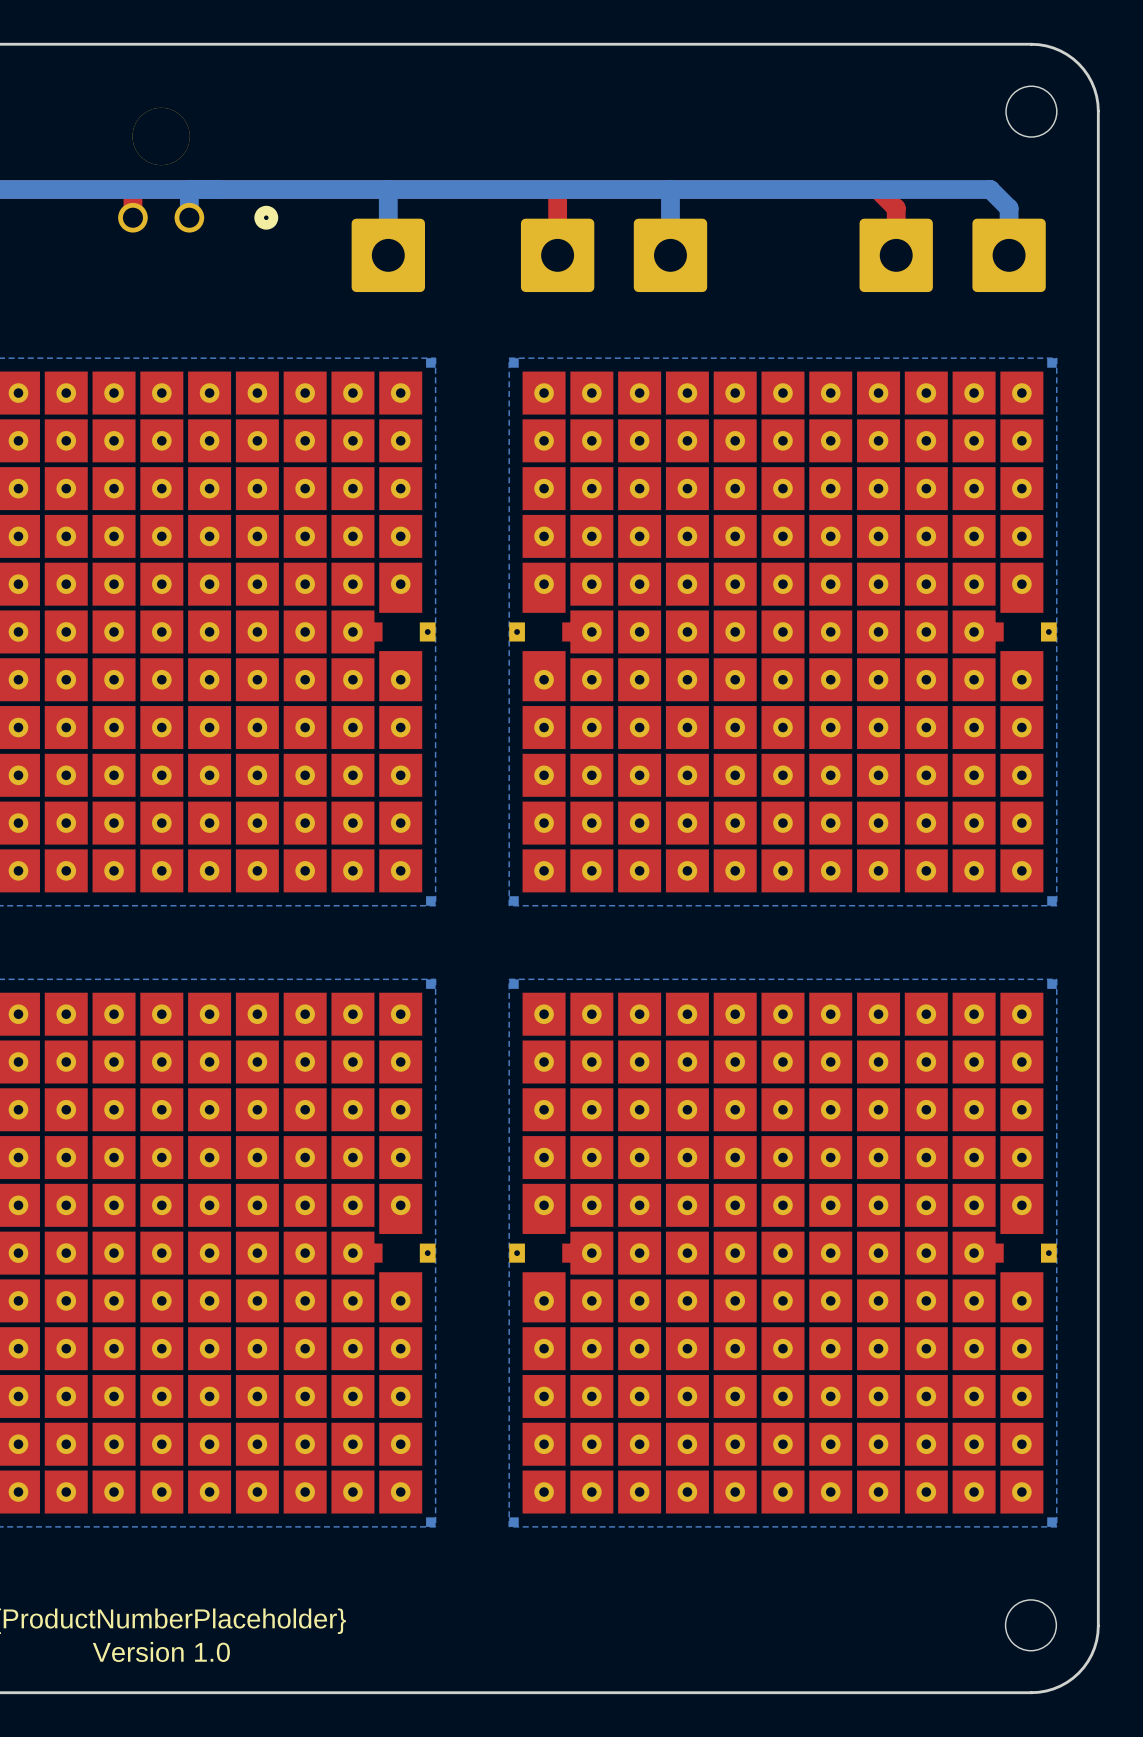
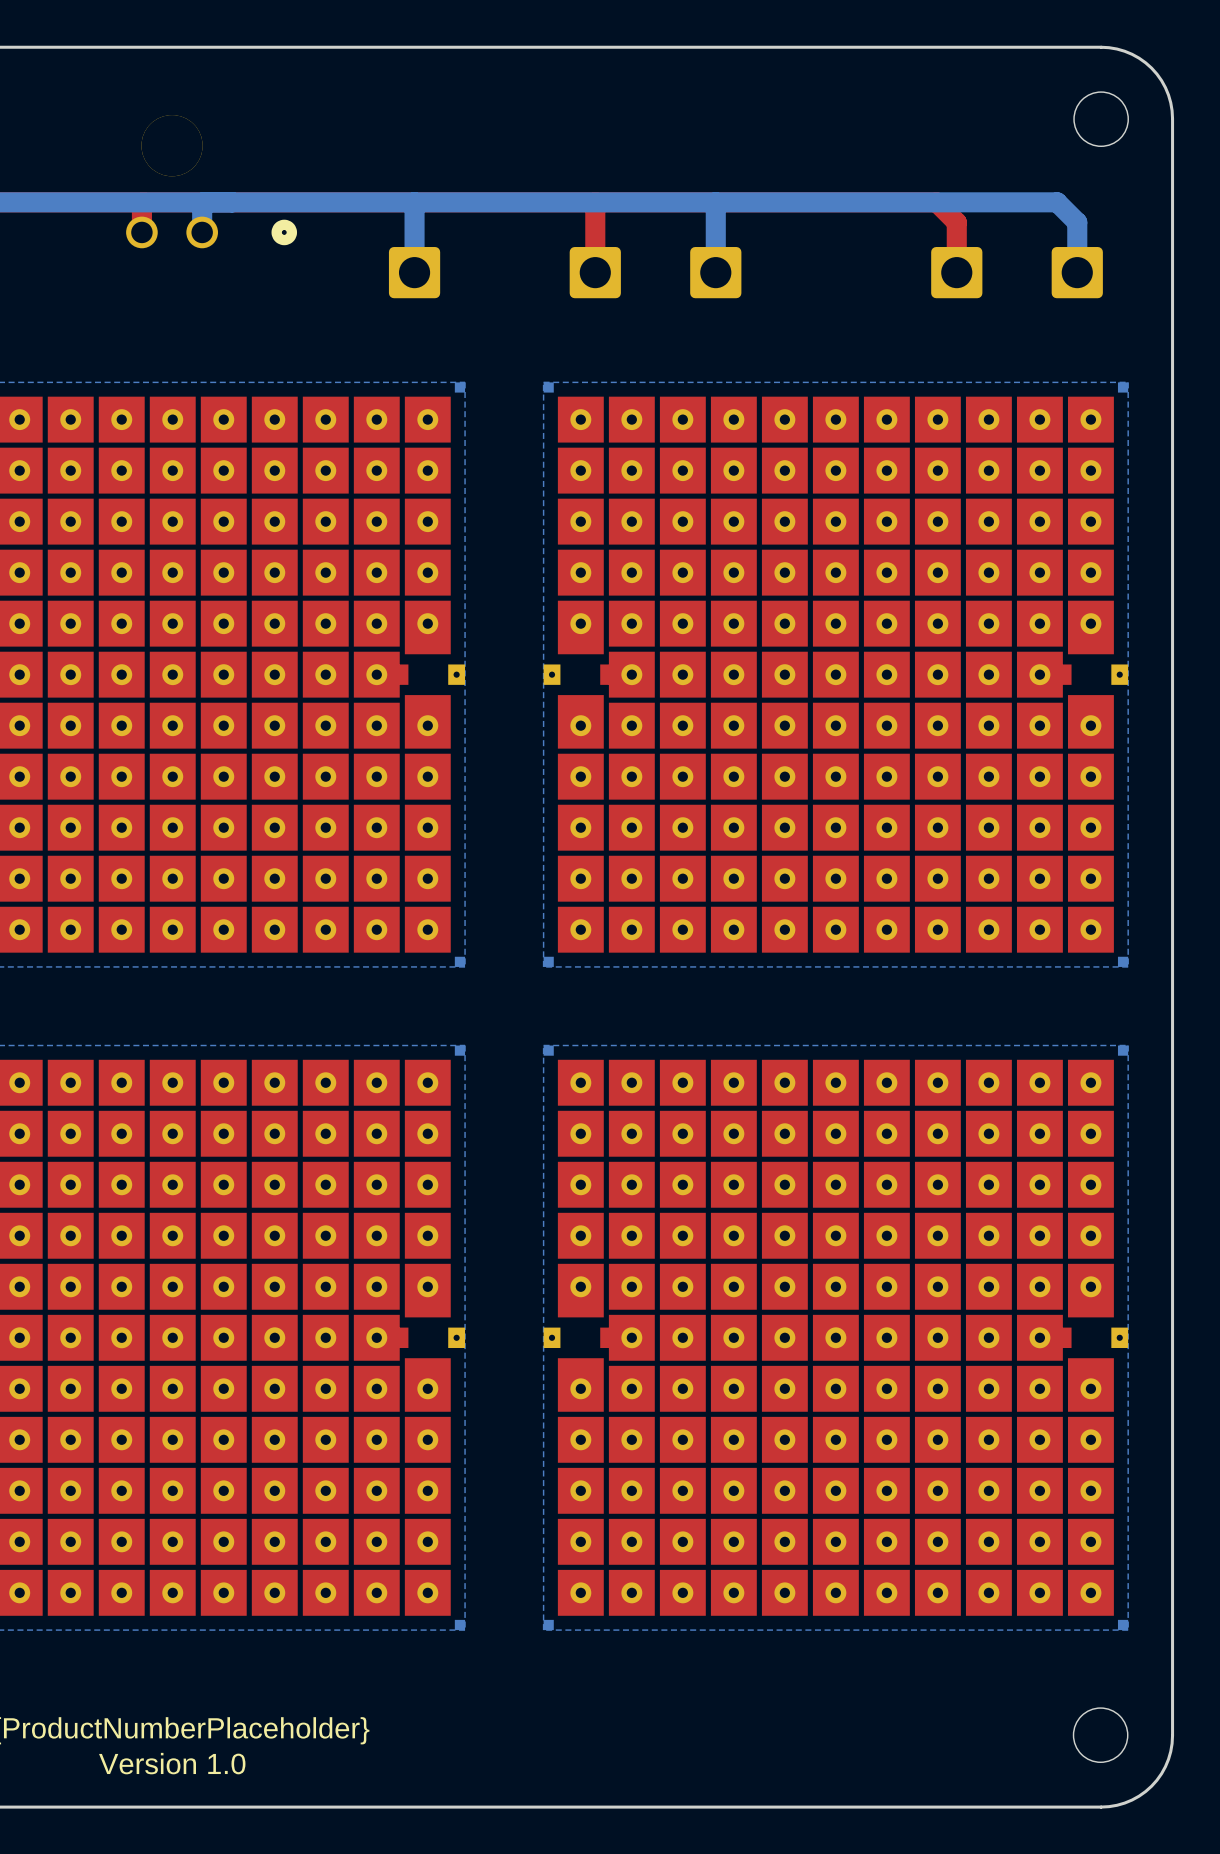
part footprint: [351, 218, 425, 293] -> [388, 247, 441, 299]
part footprint: [520, 218, 595, 293] -> [569, 247, 621, 299]
part footprint: [633, 218, 708, 293] -> [690, 247, 742, 299]
part footprint: [859, 218, 933, 293] -> [931, 247, 983, 299]
part footprint: [972, 218, 1046, 293] -> [1051, 247, 1103, 299]

